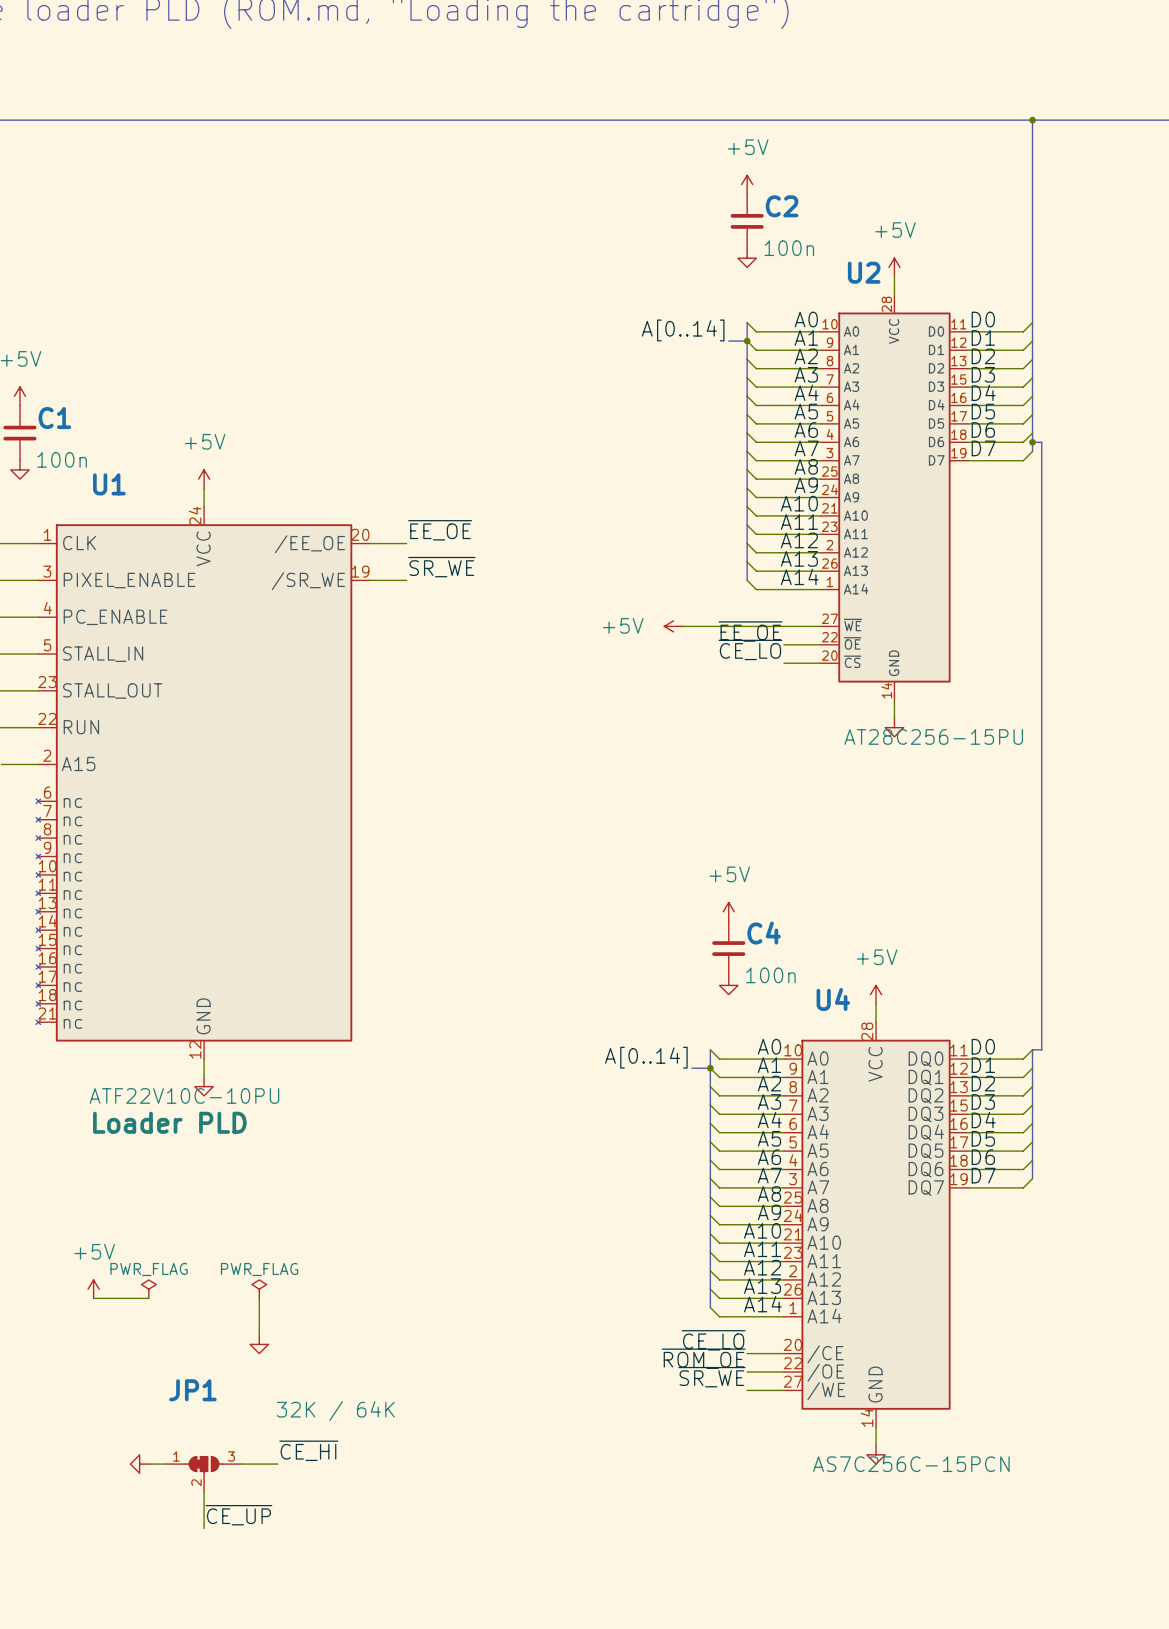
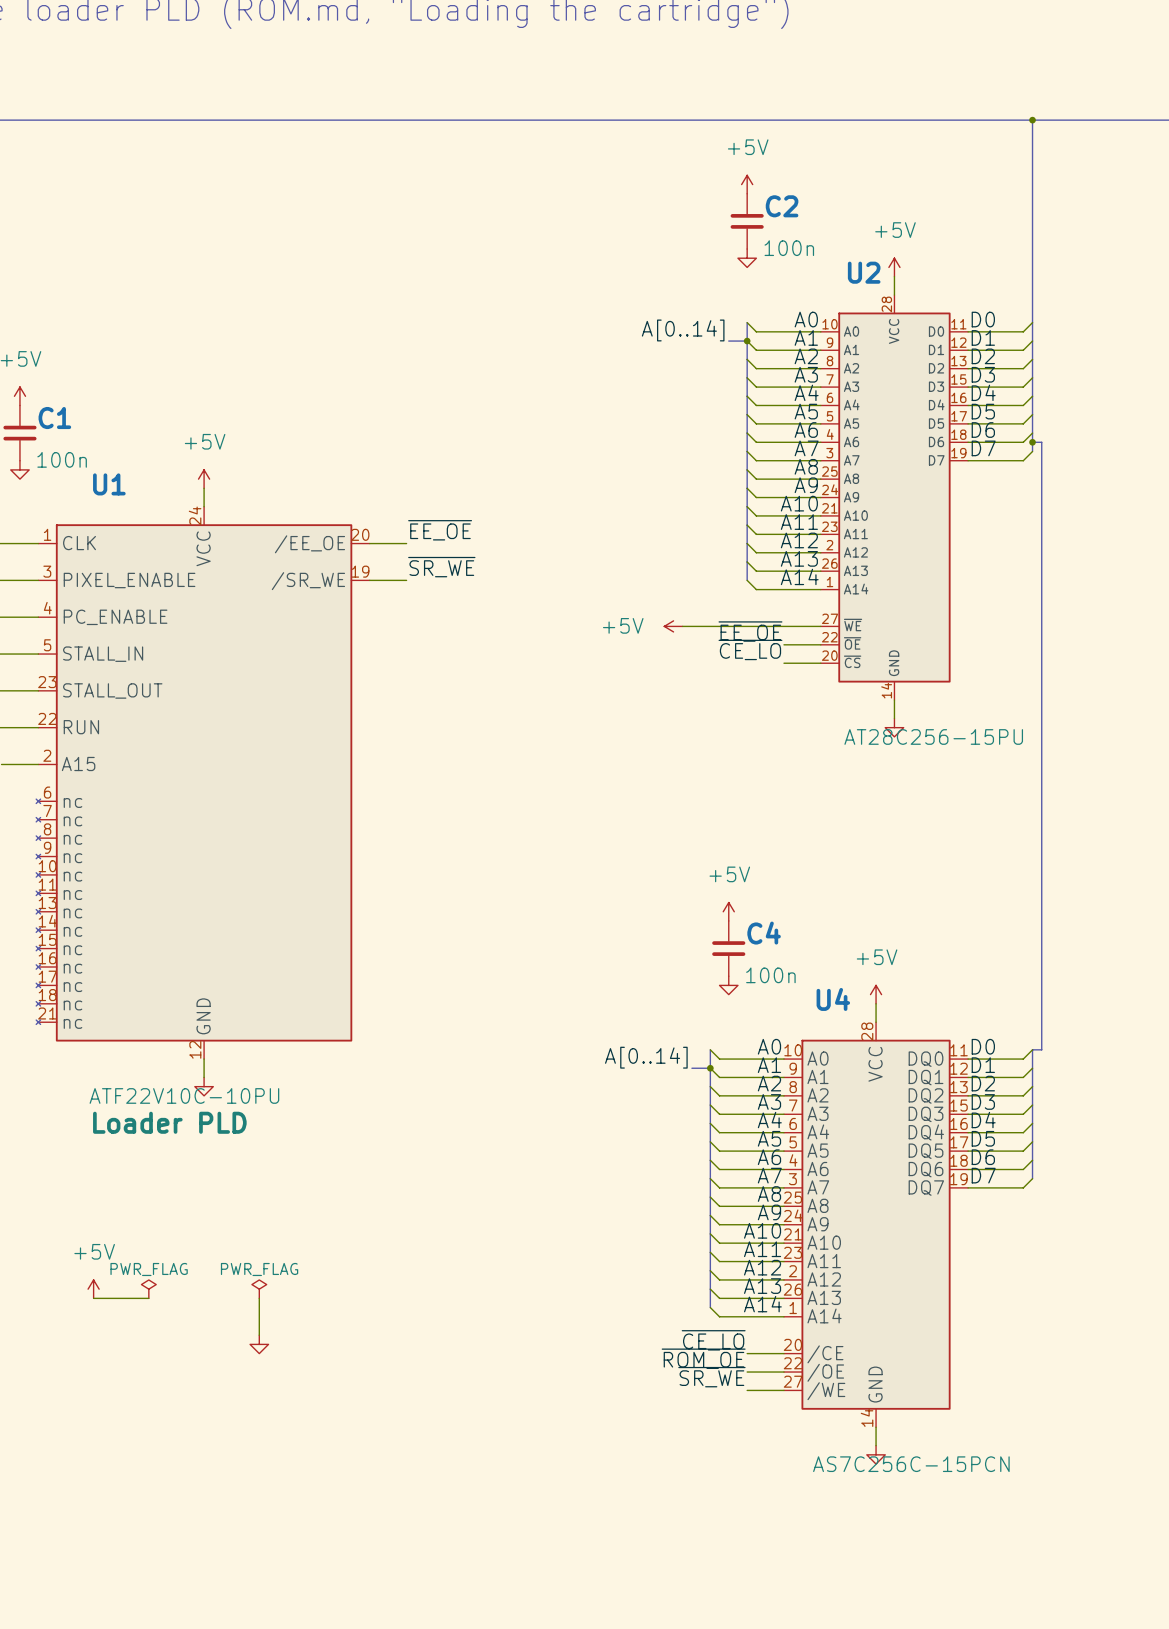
label: ~{CE_HI} (308, 1450) -> none
power symbol: (139, 1464) -> none
wire: (148, 1464) (167, 1464) -> none
wire: (240, 1464) (277, 1464) -> none
JP1: 32K / 64K (204, 1474) -> none
wire: (204, 1491) (204, 1528) -> none
label: ~{CE_UP} (238, 1515) -> none

